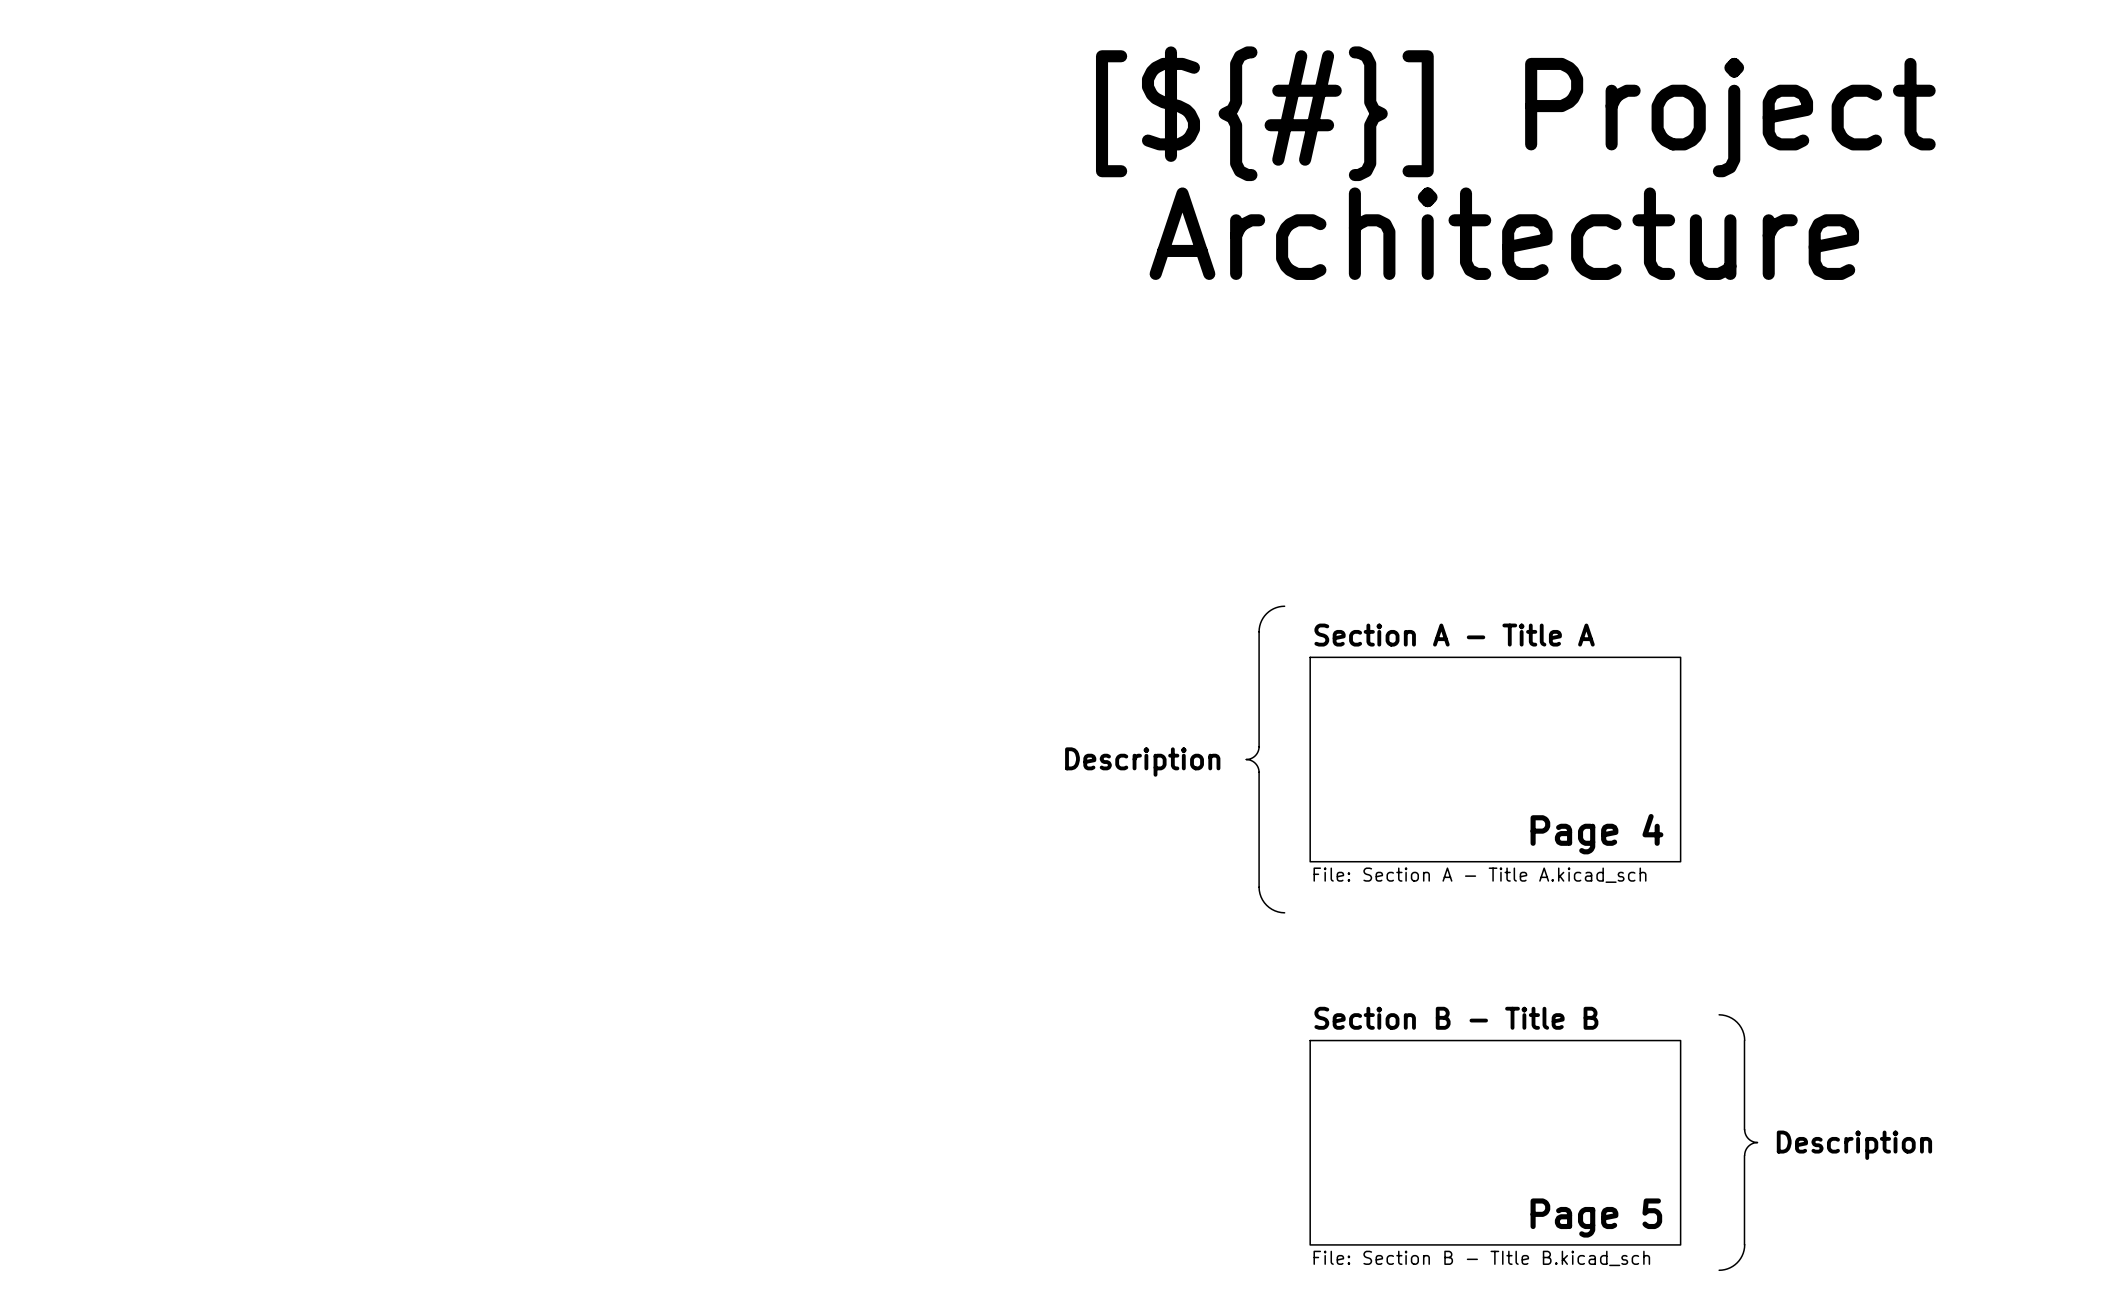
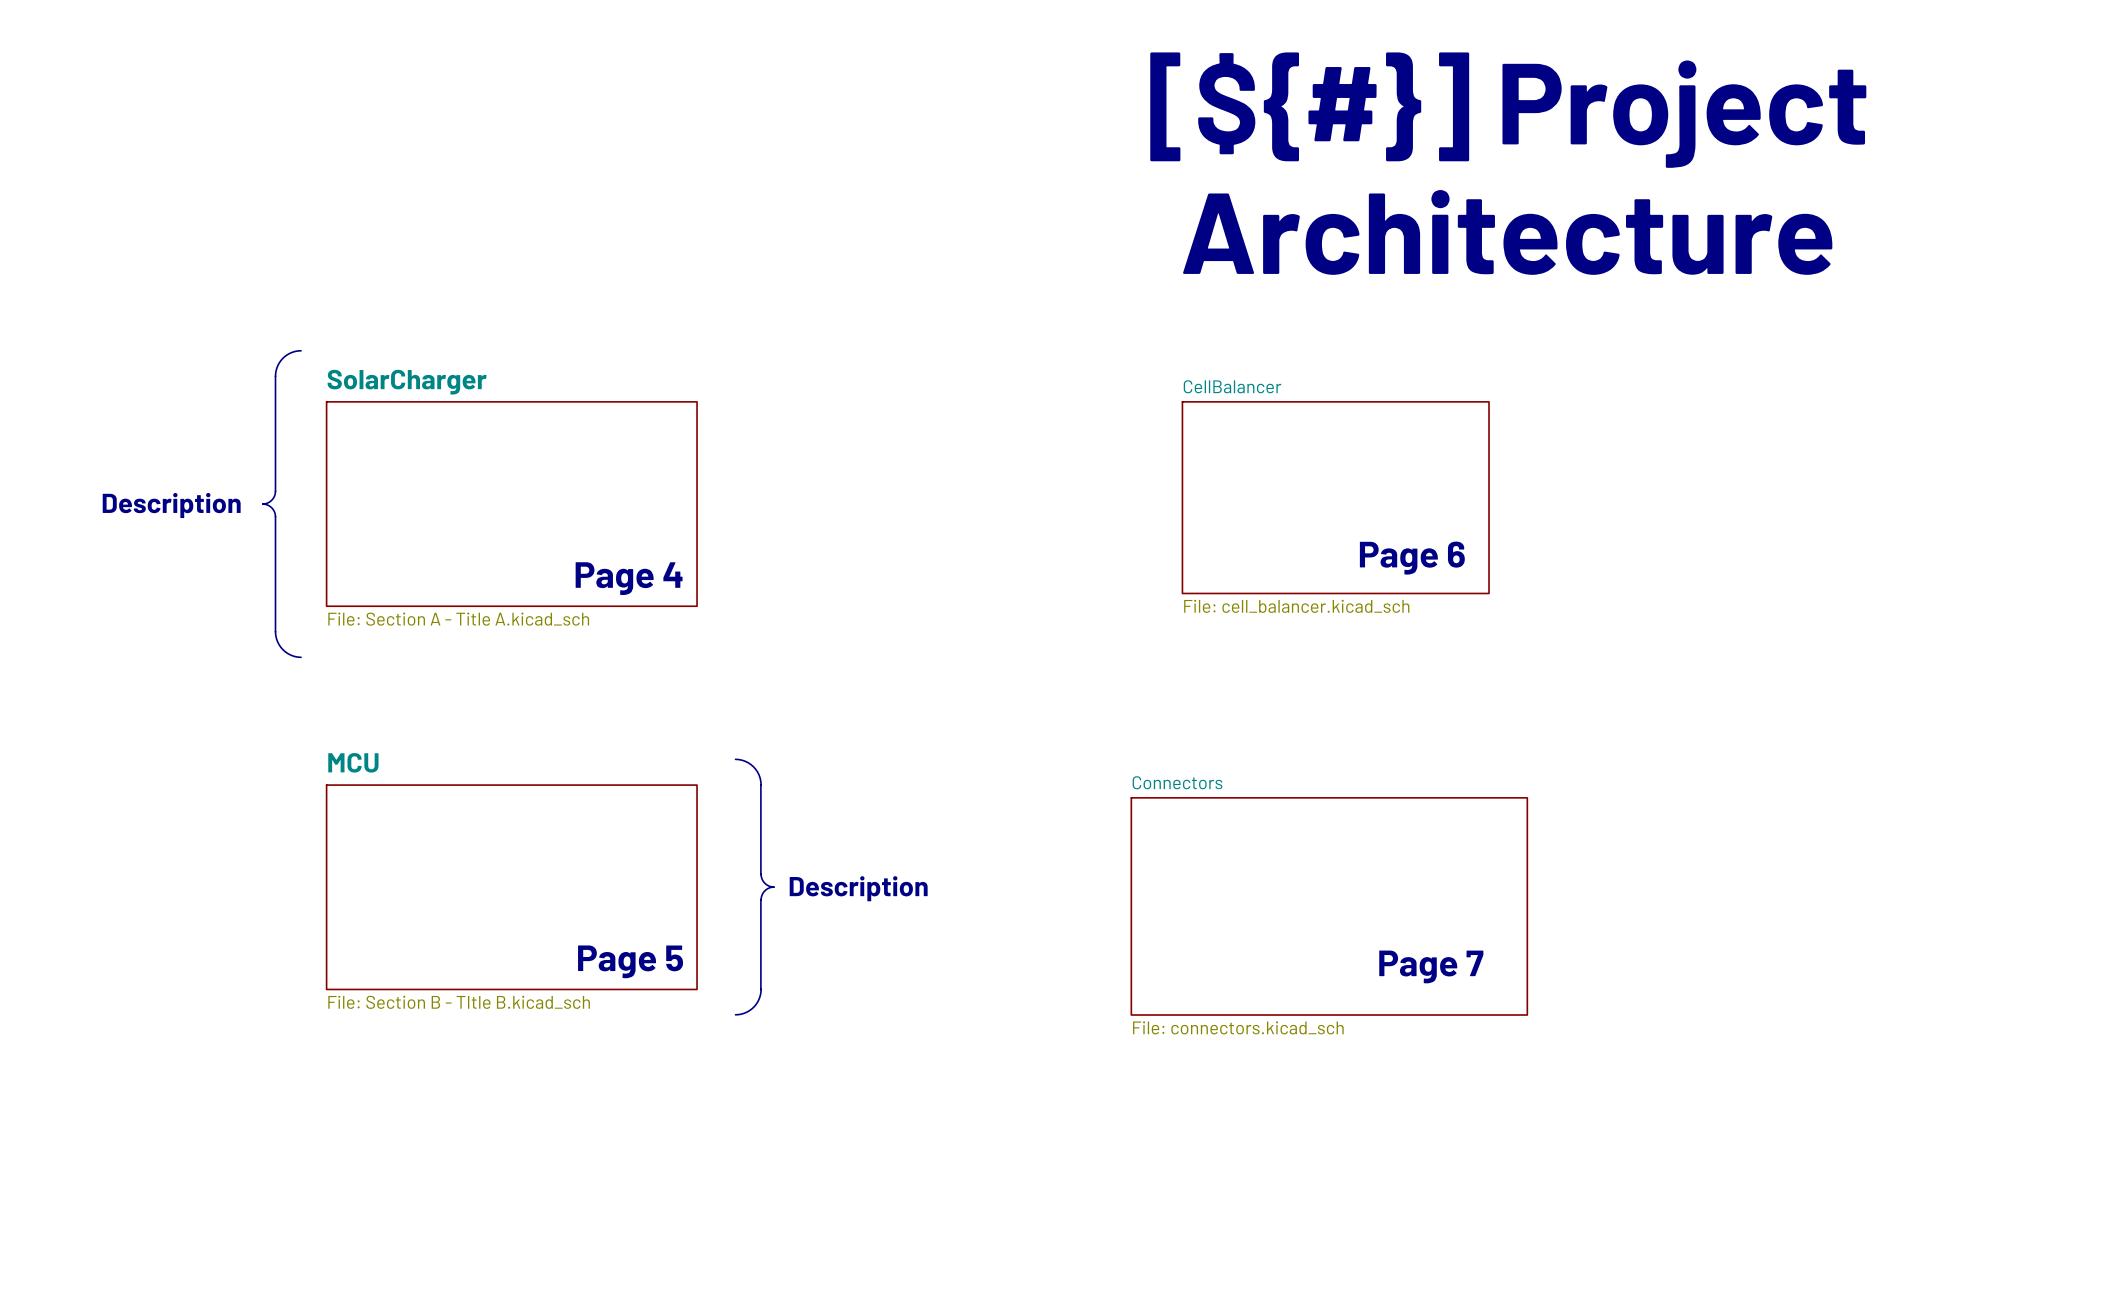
line: none -> (301, 350) (285, 356) (276, 370) (275, 492) (271, 500) (262, 504) (270, 506) (275, 515) (276, 638) (285, 652) (301, 657)
sheet CellBalancer: none -> File: cell_balancer.kicad_sch (1335, 497)
sheet SolarCharger: none -> File: Section A - Title A.kicad_sch (511, 504)
text: none -> Description (171, 505)
text: none -> Page 6 (1412, 558)
text: none -> Page 4 (629, 578)
line: (1284, 606) (1268, 611) (1259, 626) (1258, 748) (1254, 756) (1246, 759) (1254, 762) (1258, 770) (1259, 893) (1269, 907) (1284, 912) -> none
line: none -> (735, 759) (745, 761) (753, 766) (759, 775) (761, 784)
sheet Section A - Title A: File: Section A - Title A.kicad_sch (1495, 759) -> none
text: Description (1142, 762) -> none
line: none -> (760, 785) (760, 874)
text: Page 4 (1596, 834) -> none
line: none -> (761, 874) (764, 883) (773, 887) (764, 890) (761, 899)
sheet MCU: none -> File: Section B - TItle B.kicad_sch (511, 887)
text: none -> Description (858, 888)
line: none -> (760, 900) (760, 989)
sheet Connectors: none -> File: connectors.kicad_sch (1329, 906)
text: none -> Page 5 (630, 961)
text: none -> Page 7 (1431, 966)
line: none -> (761, 989) (758, 1000) (753, 1007) (746, 1012) (735, 1014)
line: (1719, 1014) (1728, 1016) (1737, 1022) (1742, 1030) (1744, 1040) -> none
line: (1744, 1040) (1744, 1129) -> none
line: (1744, 1129) (1748, 1138) (1757, 1142) (1748, 1146) (1744, 1155) -> none
sheet Section B - Title B: File: Section B - TItle B.kicad_sch (1495, 1142) -> none
text: Description (1854, 1145) -> none
line: (1744, 1155) (1744, 1244) -> none
text: Page 5 (1596, 1218) -> none
line: (1744, 1244) (1743, 1253) (1737, 1262) (1727, 1268) (1719, 1270) -> none

